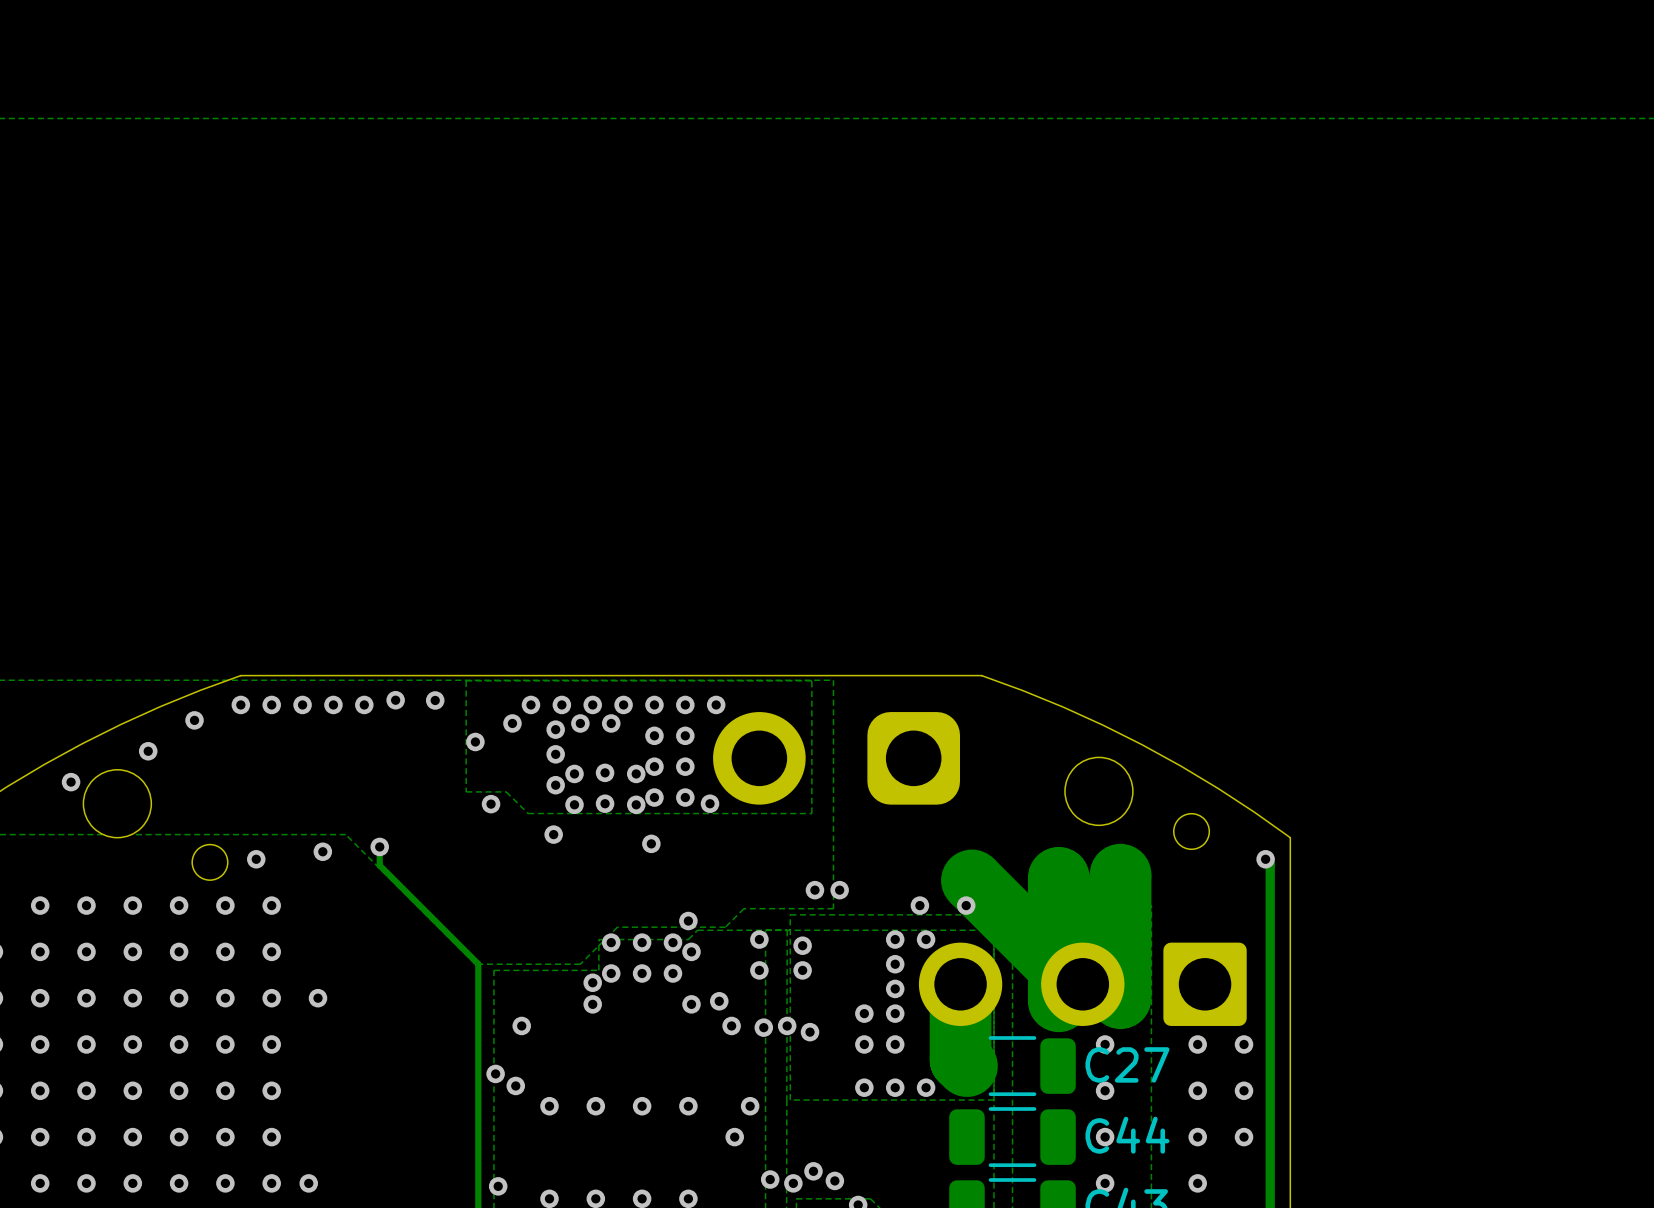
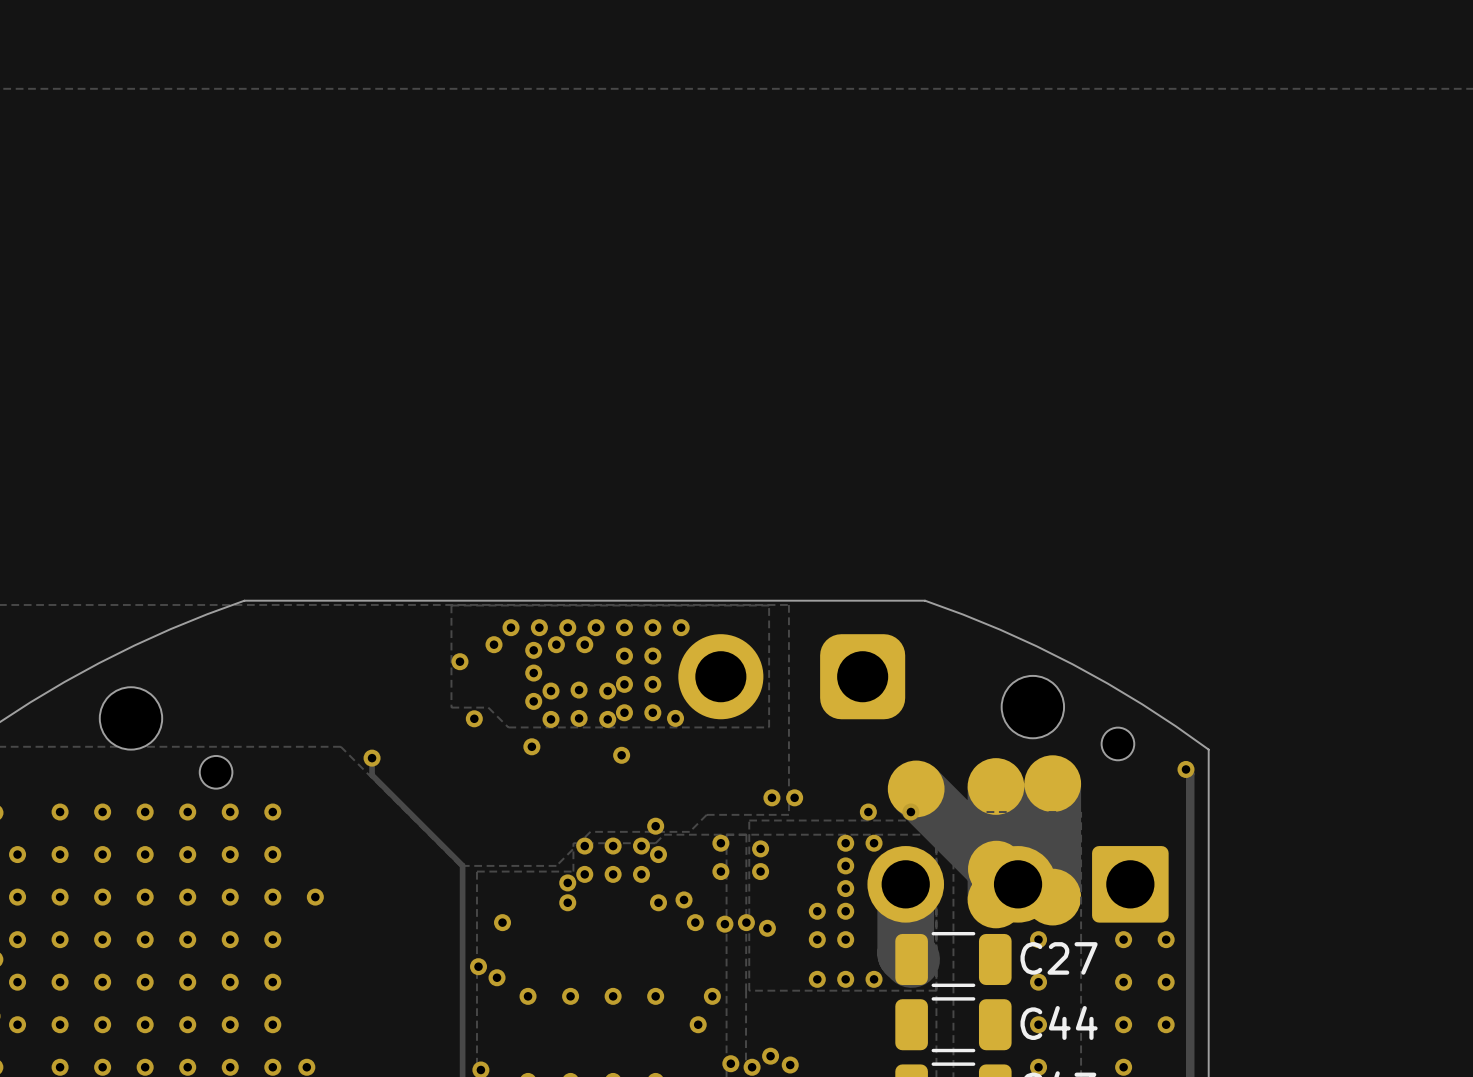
via: (395, 700) -> none
via: (435, 700) -> none
via: (240, 704) -> none
via: (271, 704) -> none
via: (302, 704) -> none
via: (333, 704) -> none
via: (364, 704) -> none
via: (194, 720) -> none
via: (148, 751) -> none
via: (71, 782) -> none
via: (322, 851) -> none
via: (256, 859) -> none

